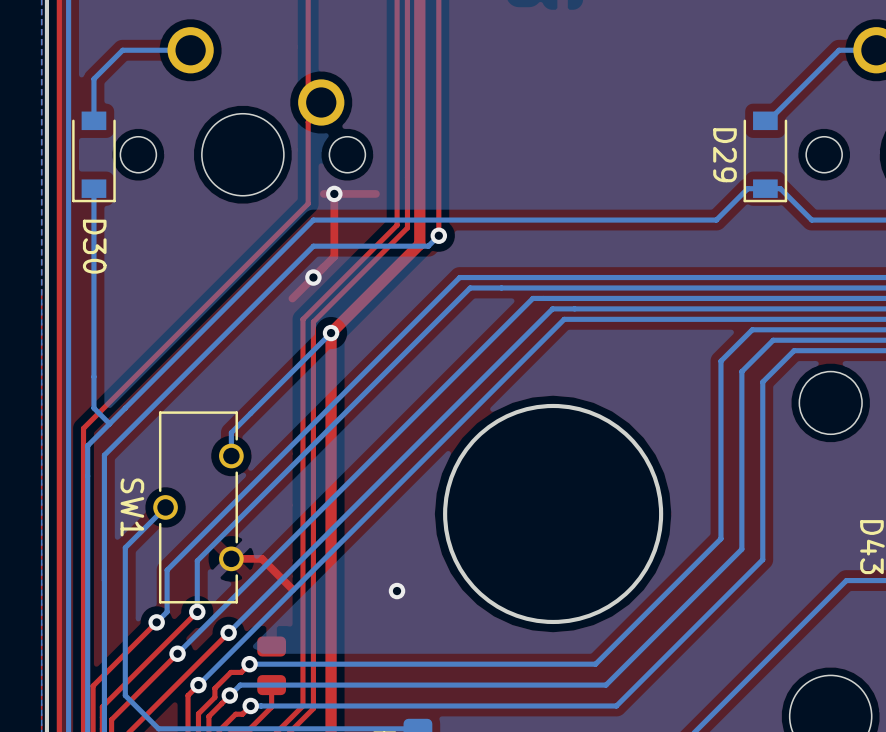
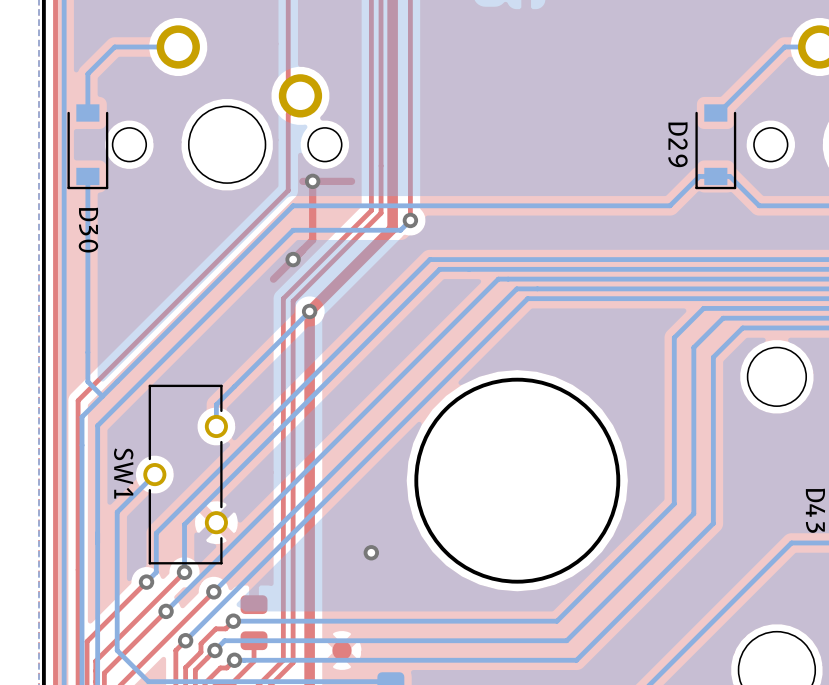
top track: (231, 558) (261, 558) (292, 589) -> none
part: none -> (341, 650)

